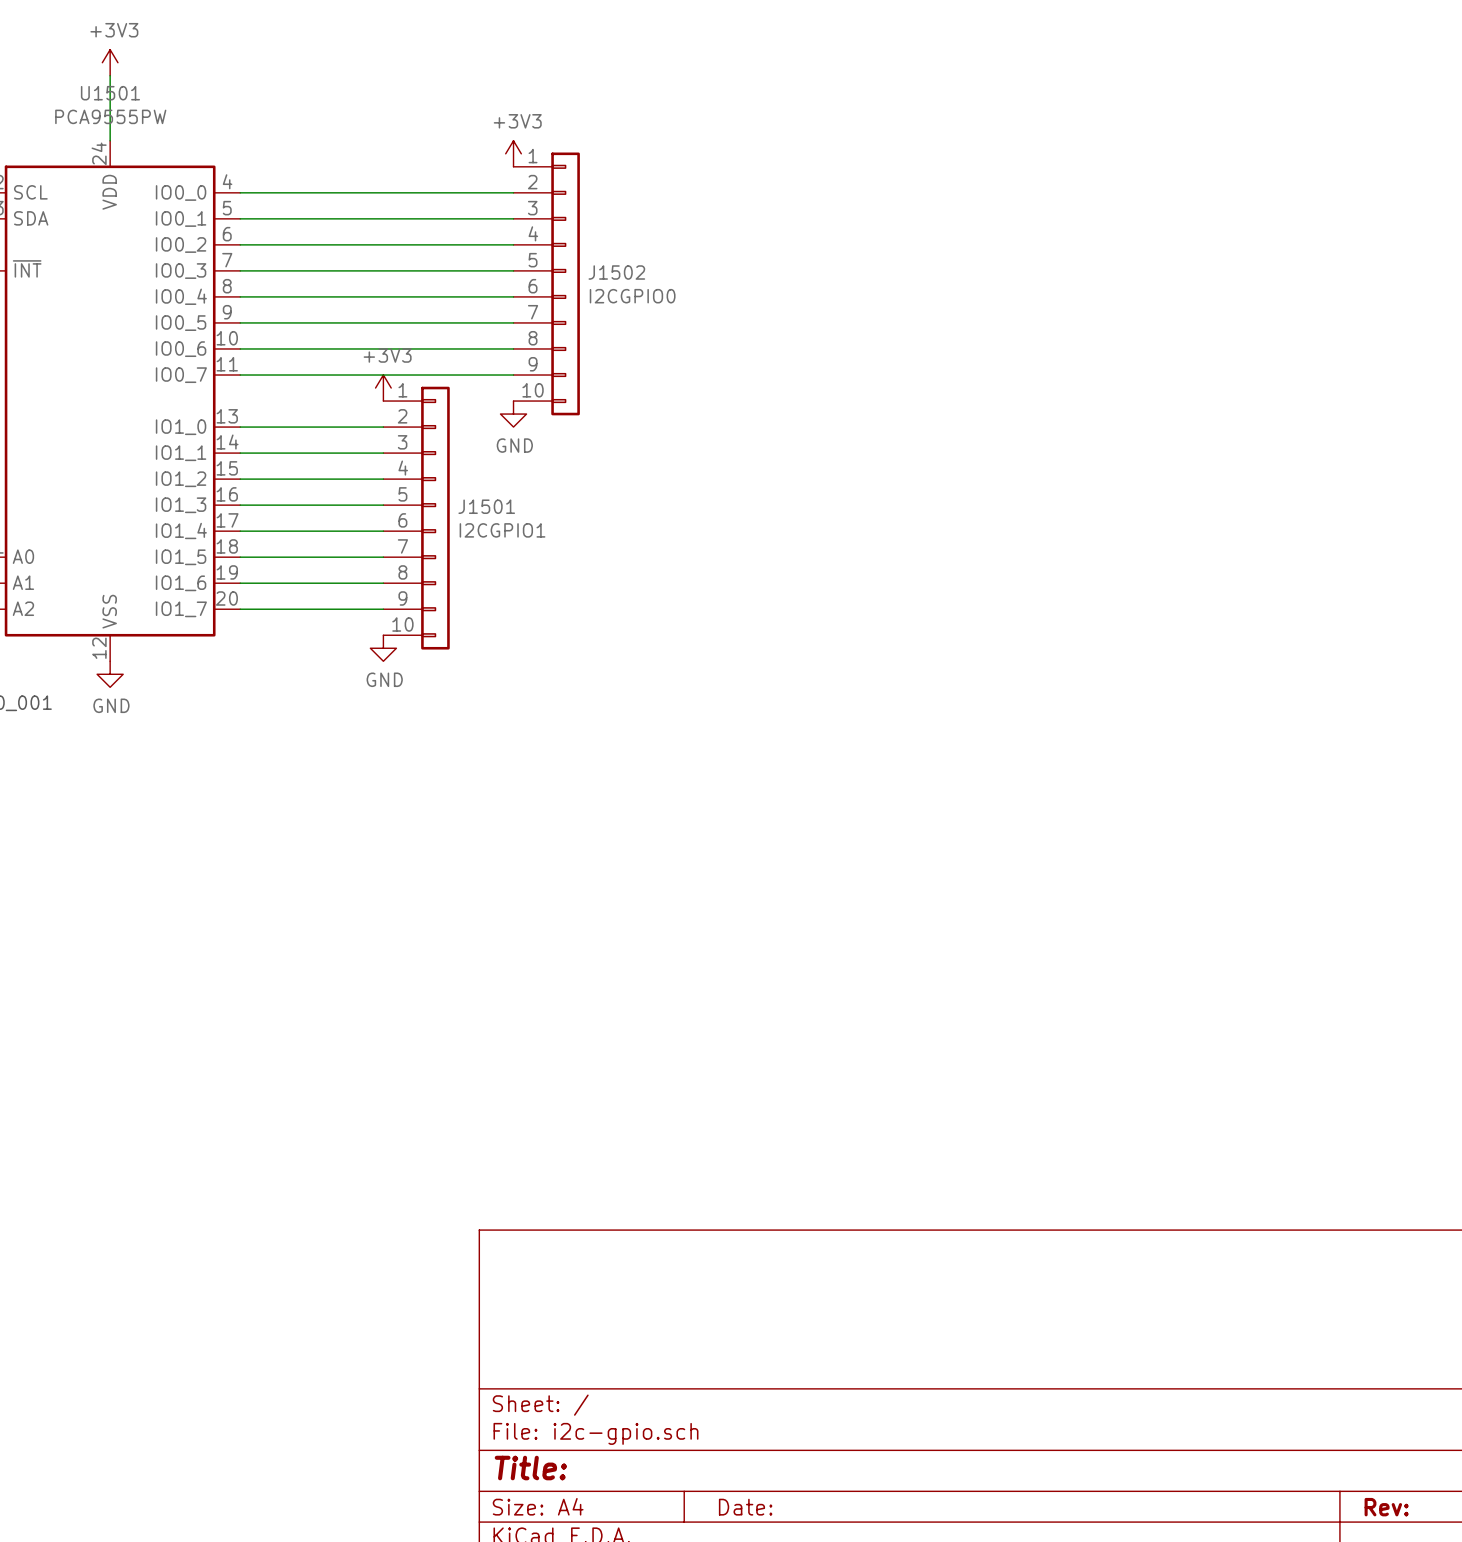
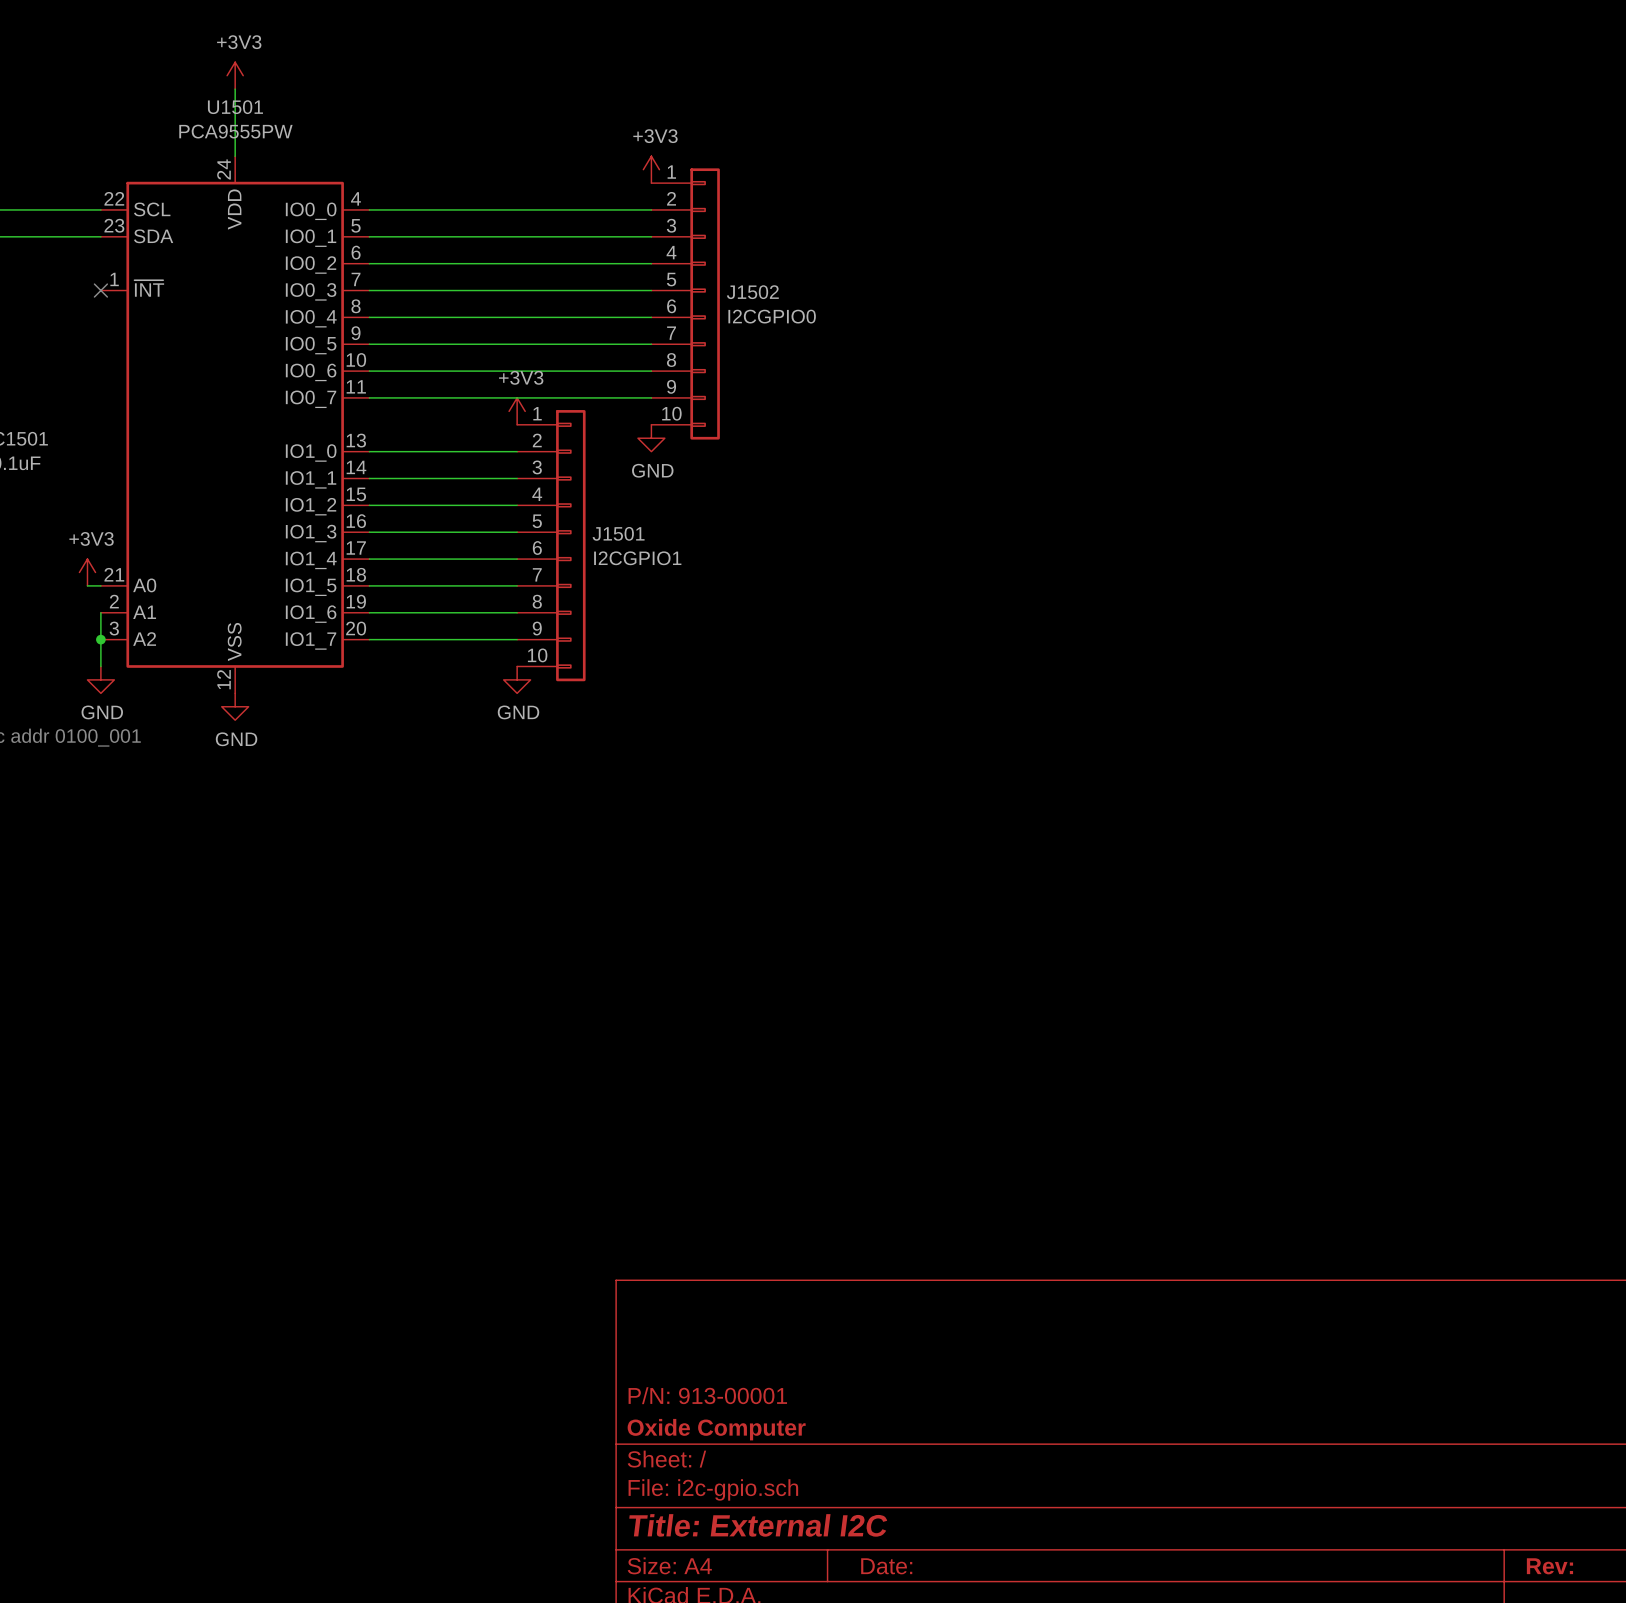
title block: none -> P/N: 913-00001 (707, 1395)
title block: none -> Oxide Computer (716, 1429)
title block: Title: (530, 1468) -> Title: External I2C (758, 1525)

